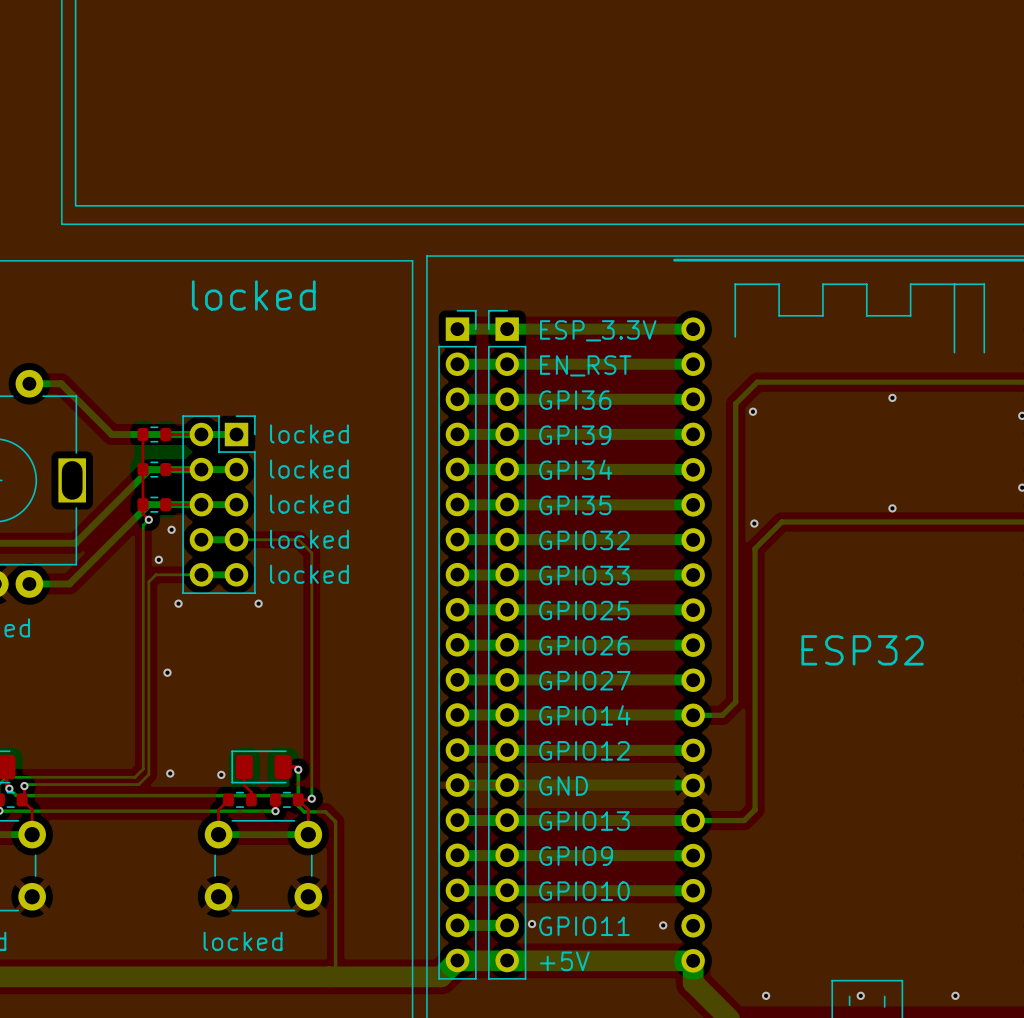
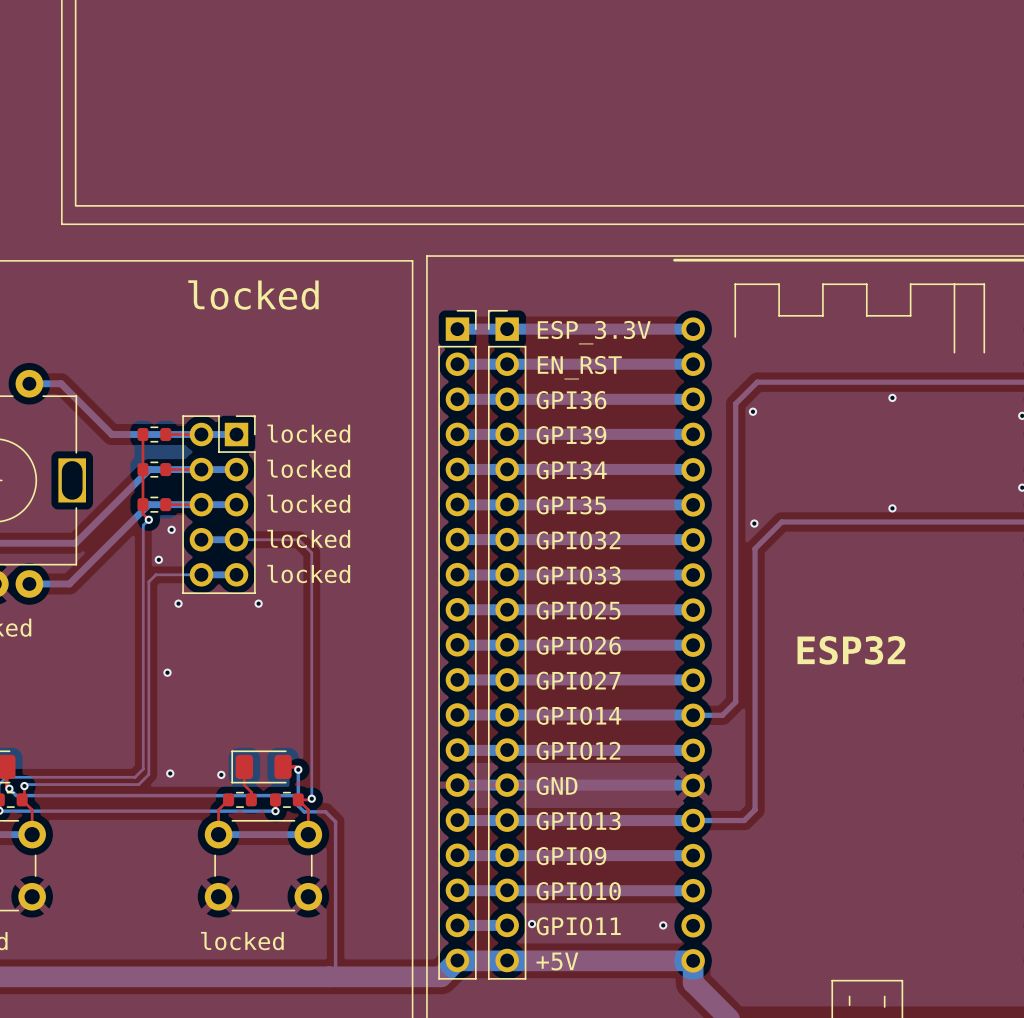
via: (766, 995) -> none
via: (860, 995) -> none
via: (955, 995) -> none

